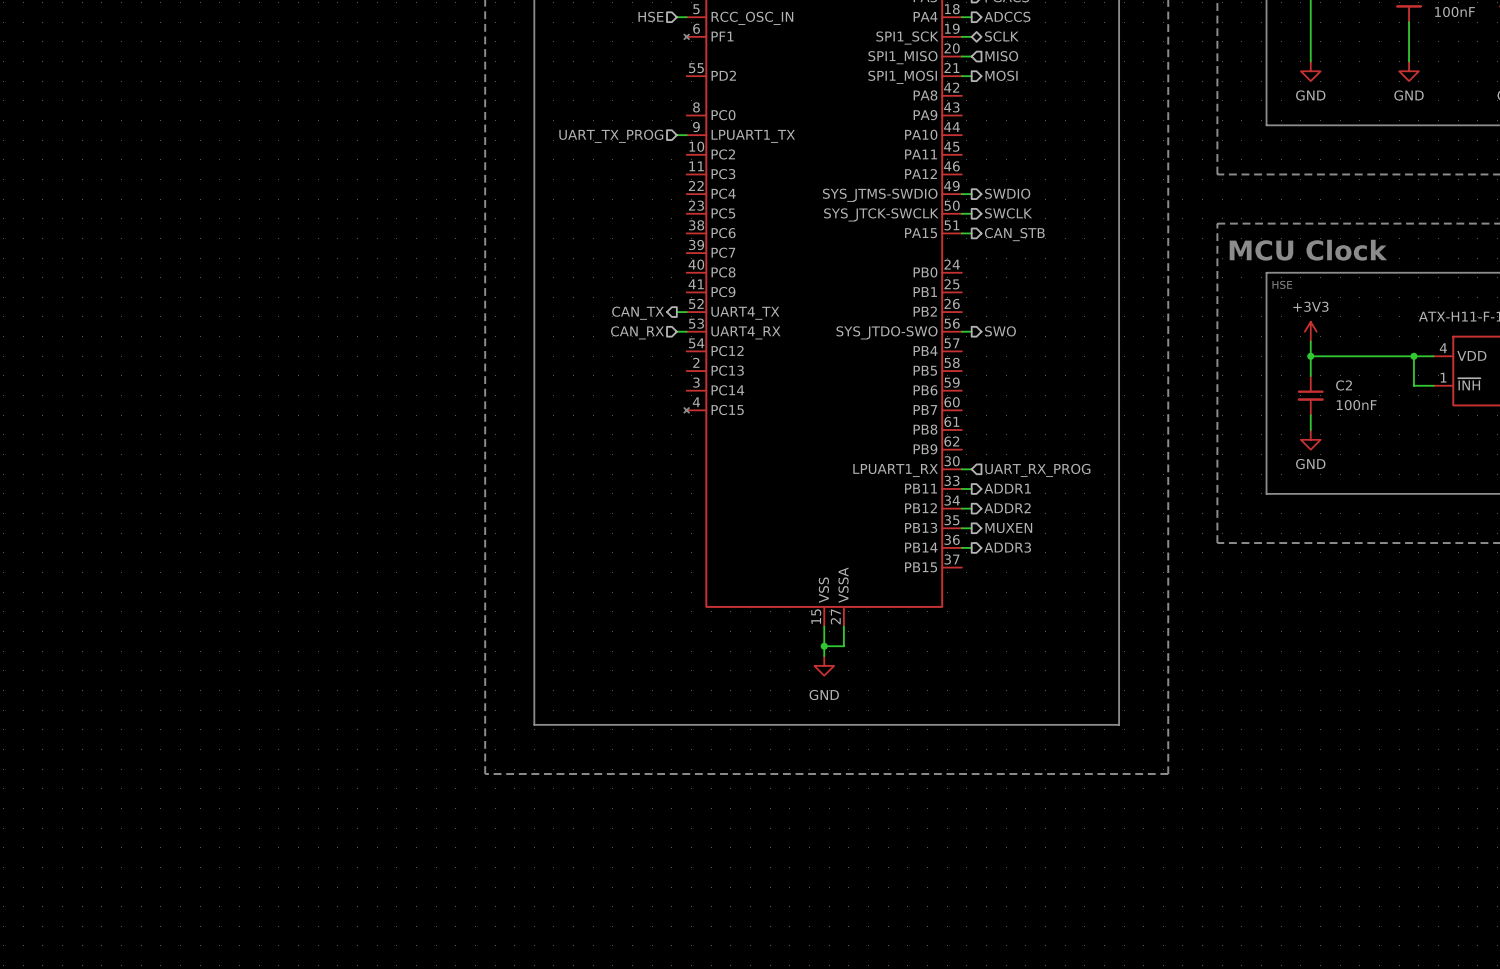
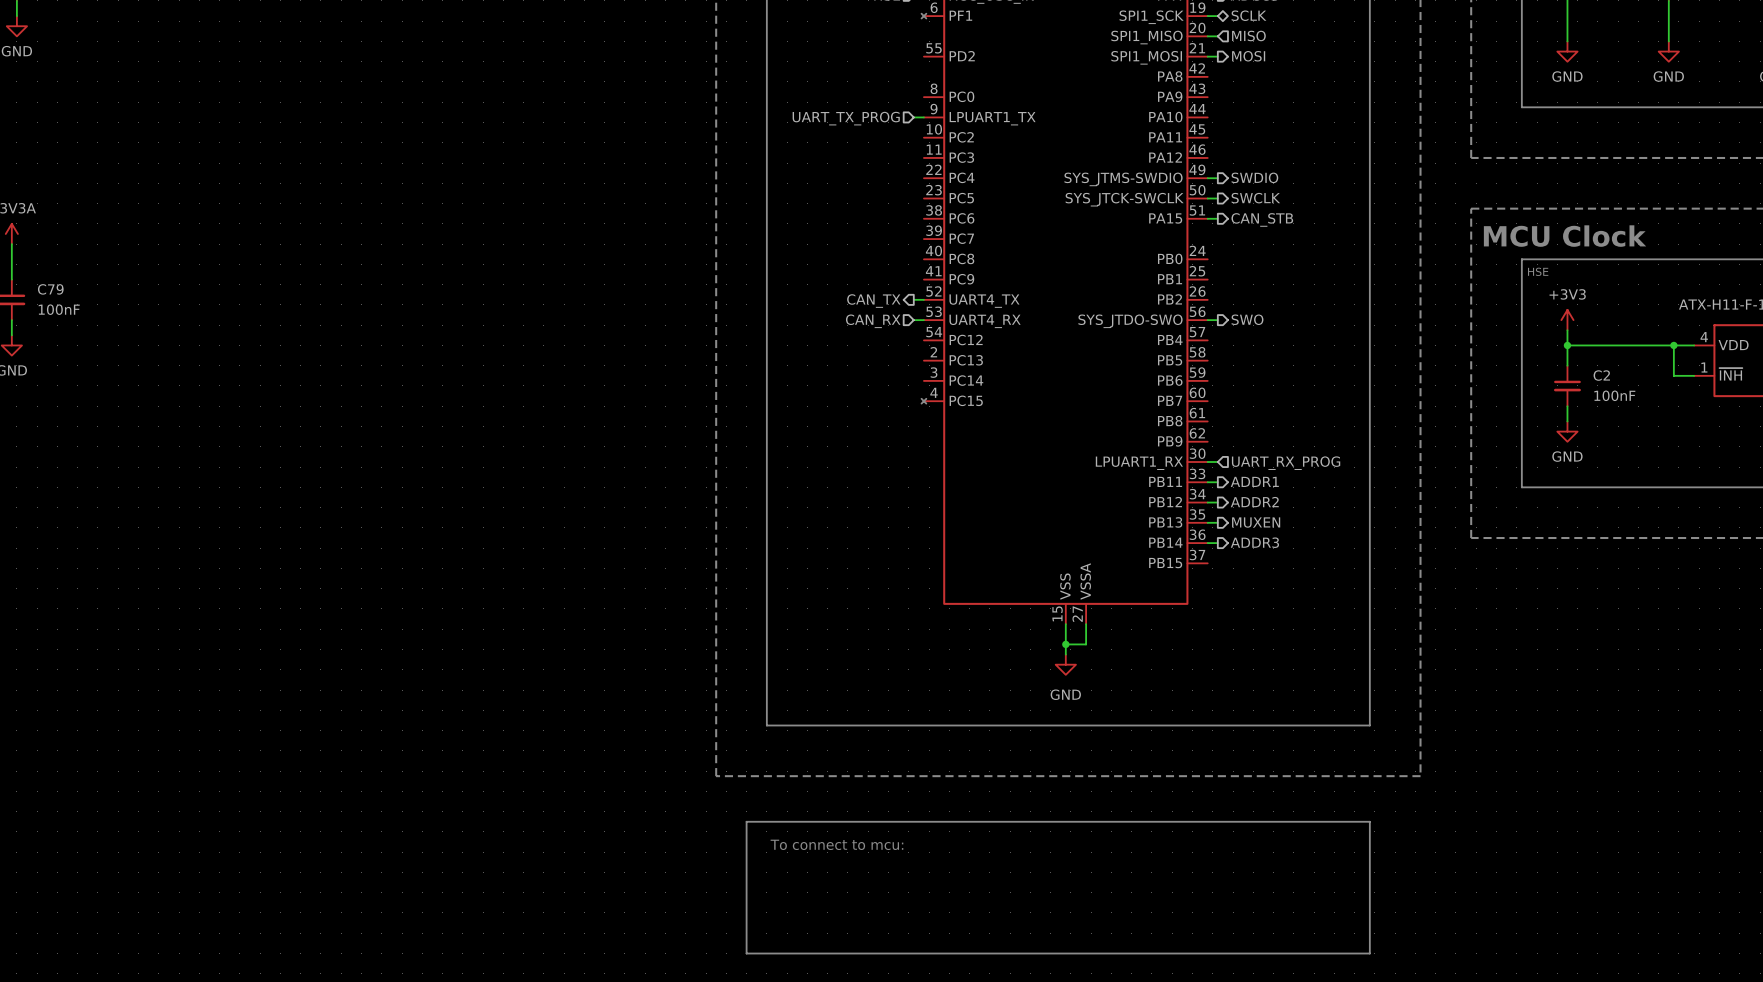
line: none -> (746, 821) (1369, 821) (1369, 953) (746, 953) (746, 821)
text: none -> To connect to mcu: (836, 844)

